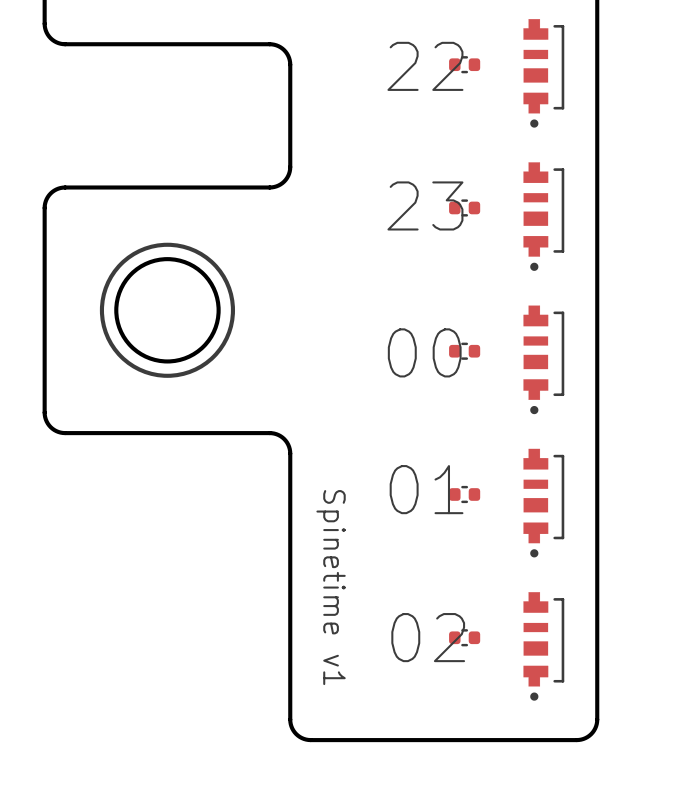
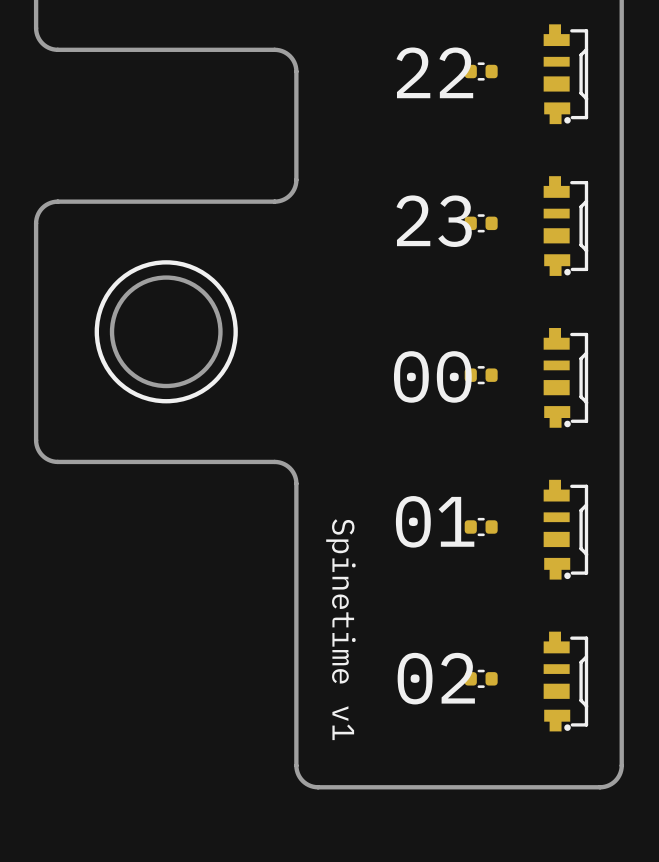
part footprint: [523, 19, 565, 128] -> [543, 24, 589, 125]
part footprint: [523, 162, 565, 271] -> [543, 176, 589, 276]
part footprint: [523, 305, 565, 415] -> [543, 327, 589, 428]
part footprint: [523, 448, 565, 558] -> [543, 479, 589, 580]
part footprint: [523, 592, 565, 701] -> [543, 631, 589, 732]

